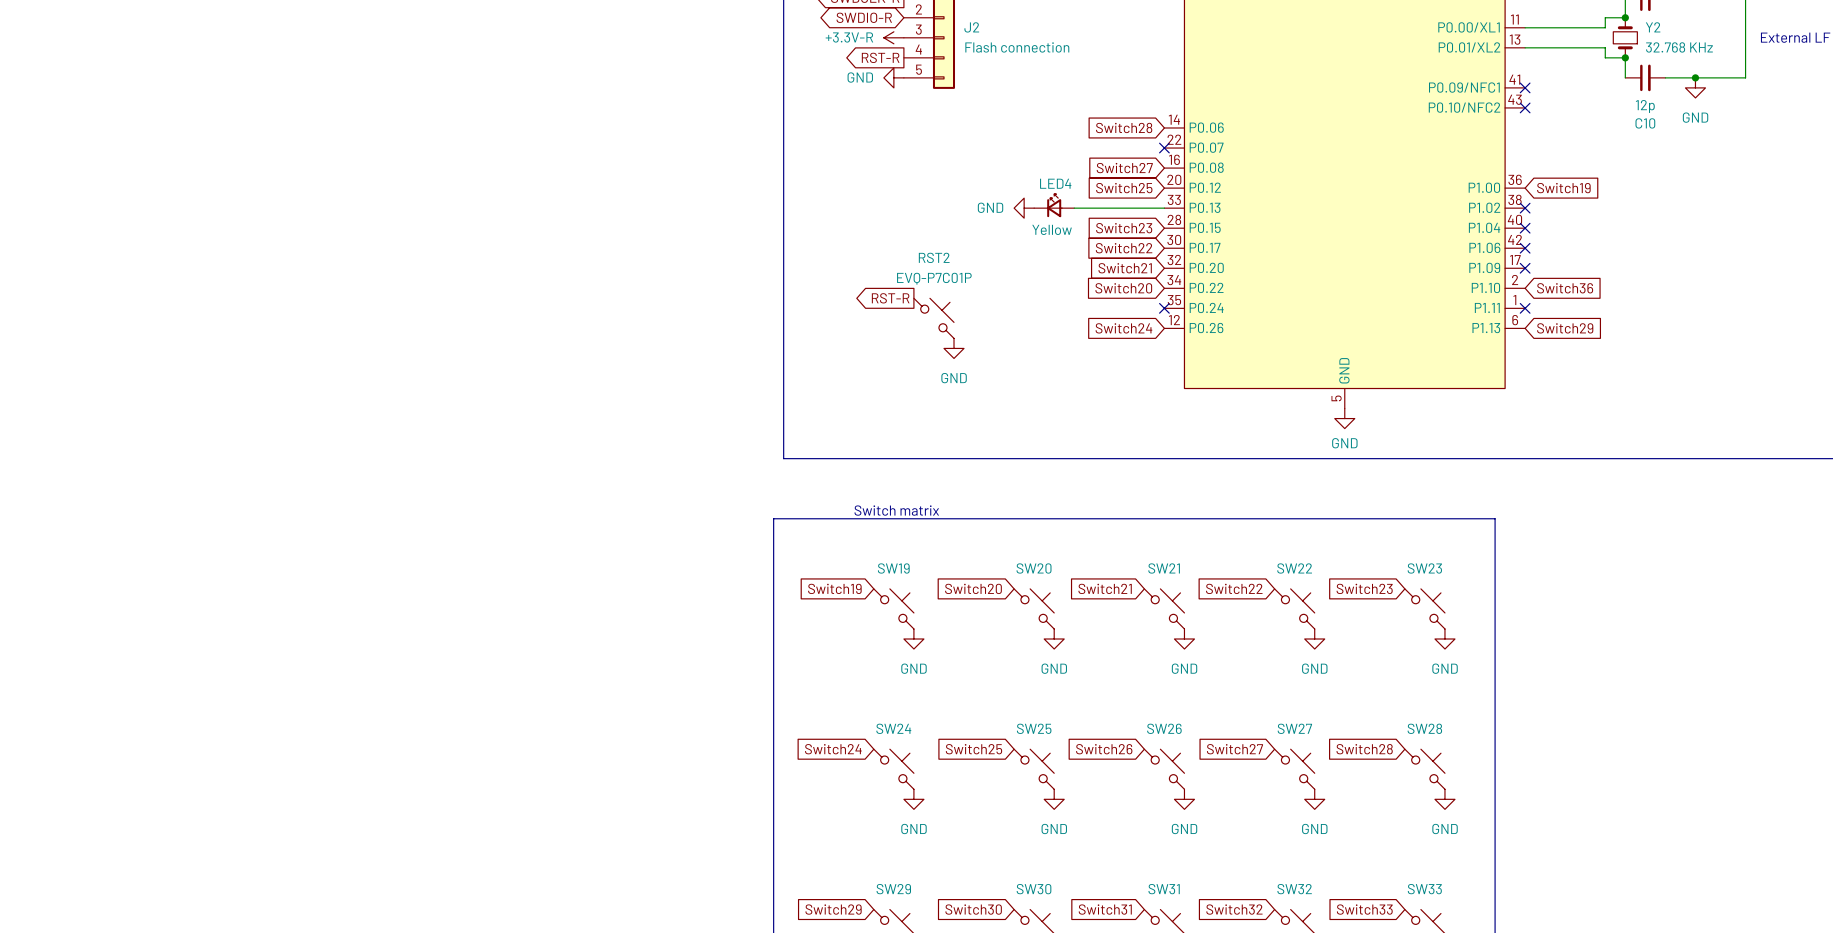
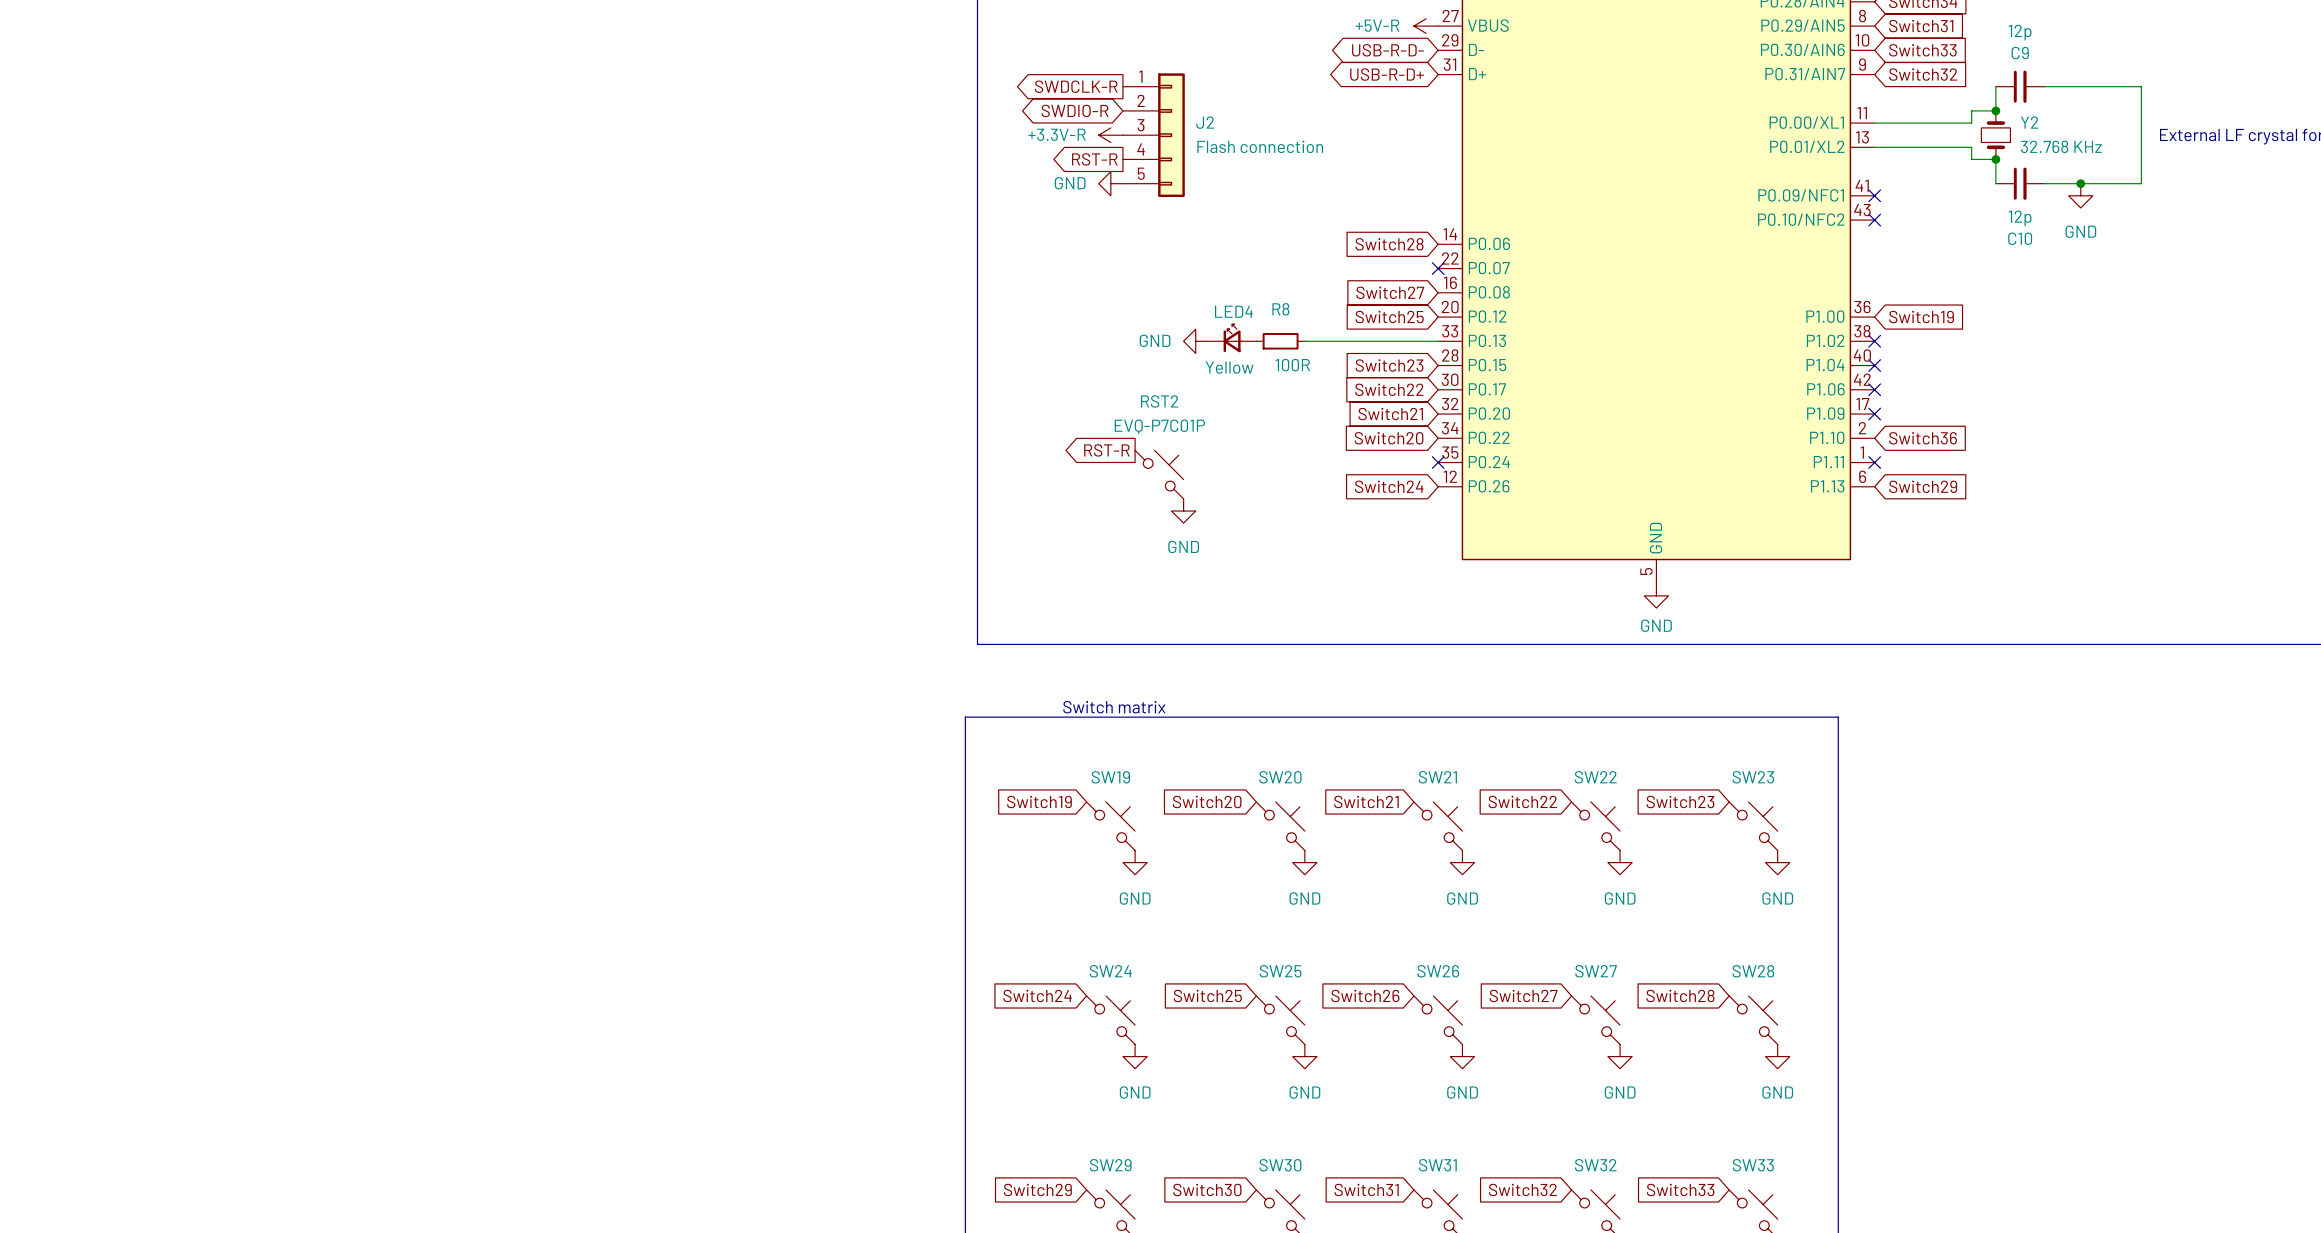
LED4 position: (1054, 205) -> (1232, 338)
power symbol position: GND (1024, 208) -> GND (1195, 341)
R8: none -> 100R (1280, 341)

